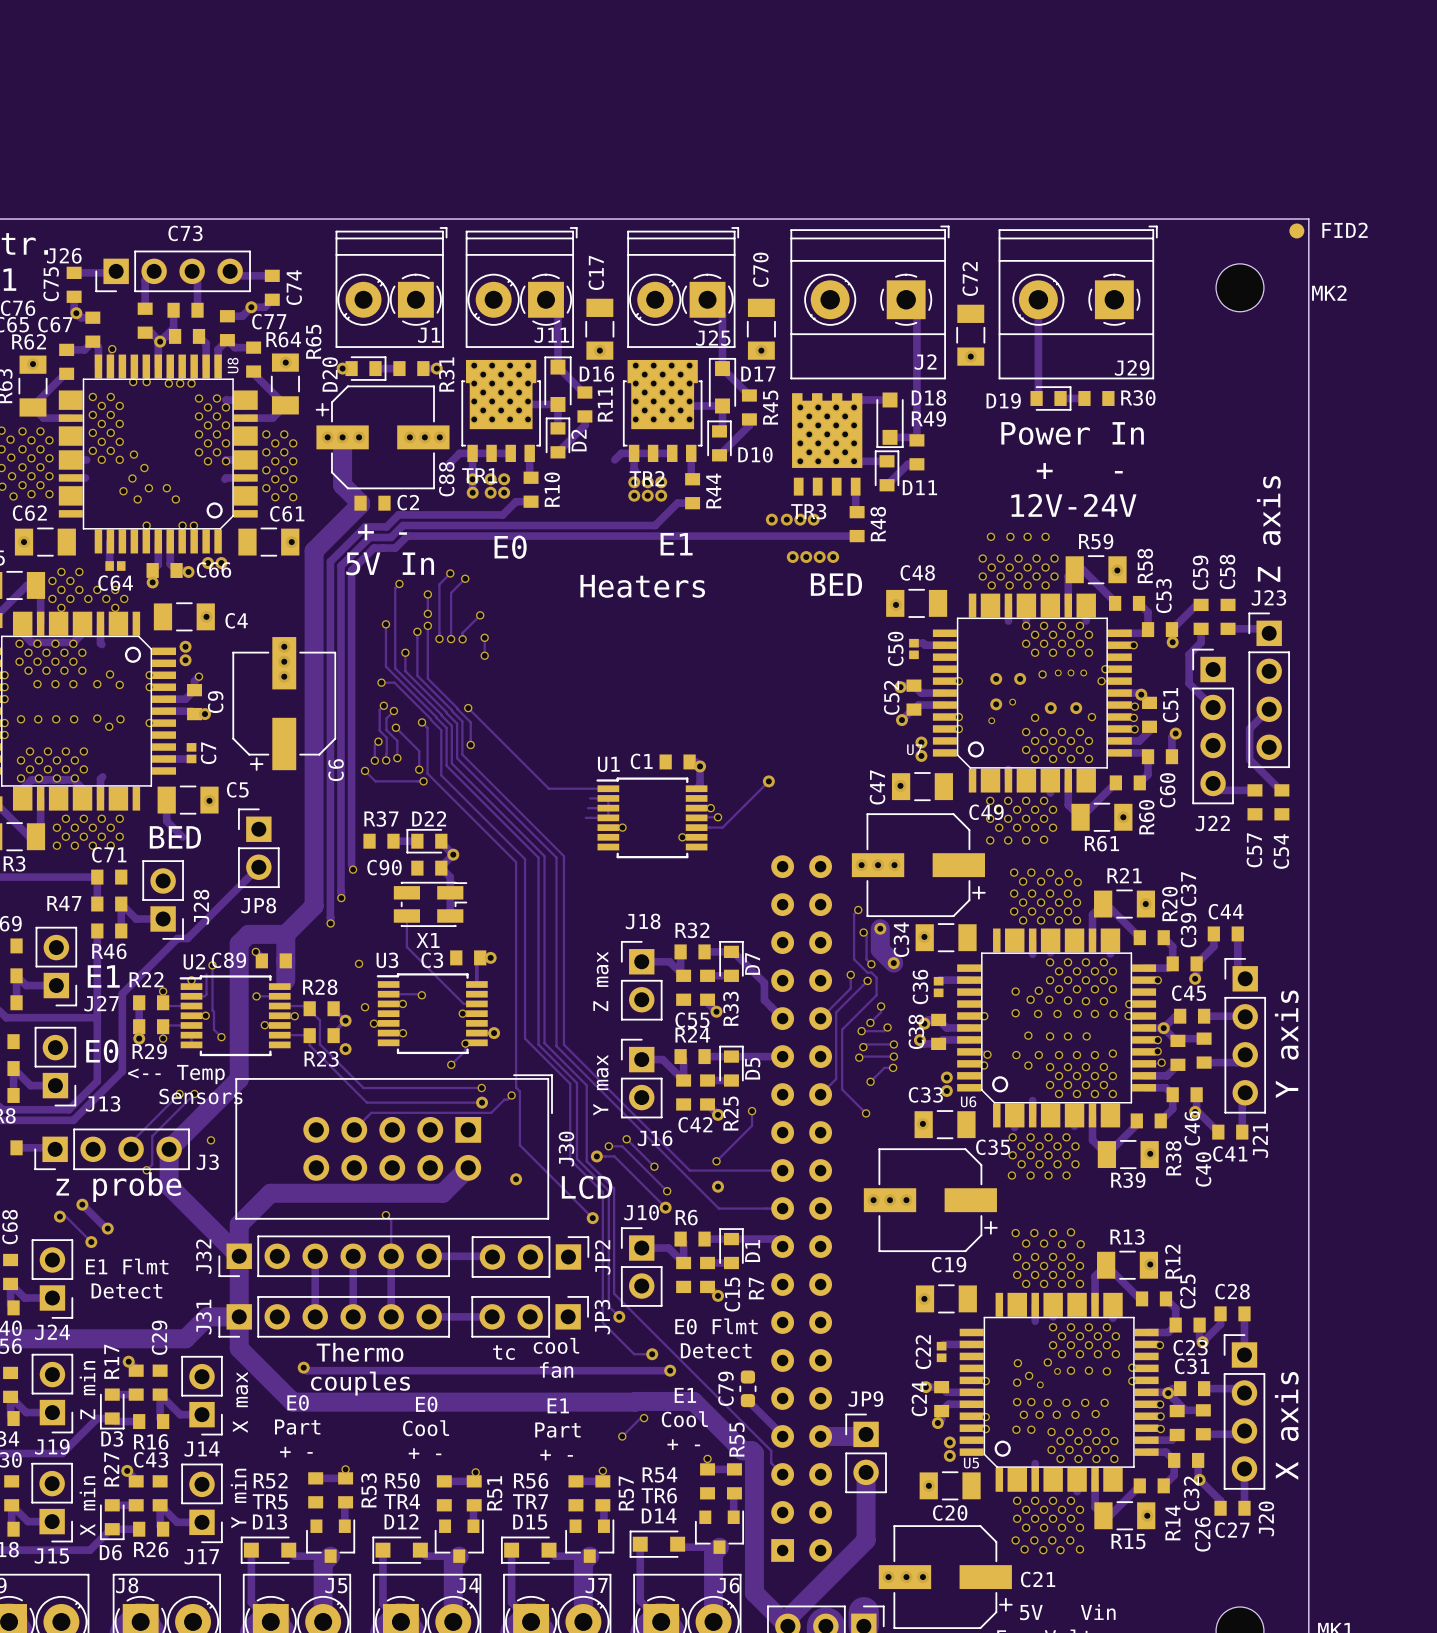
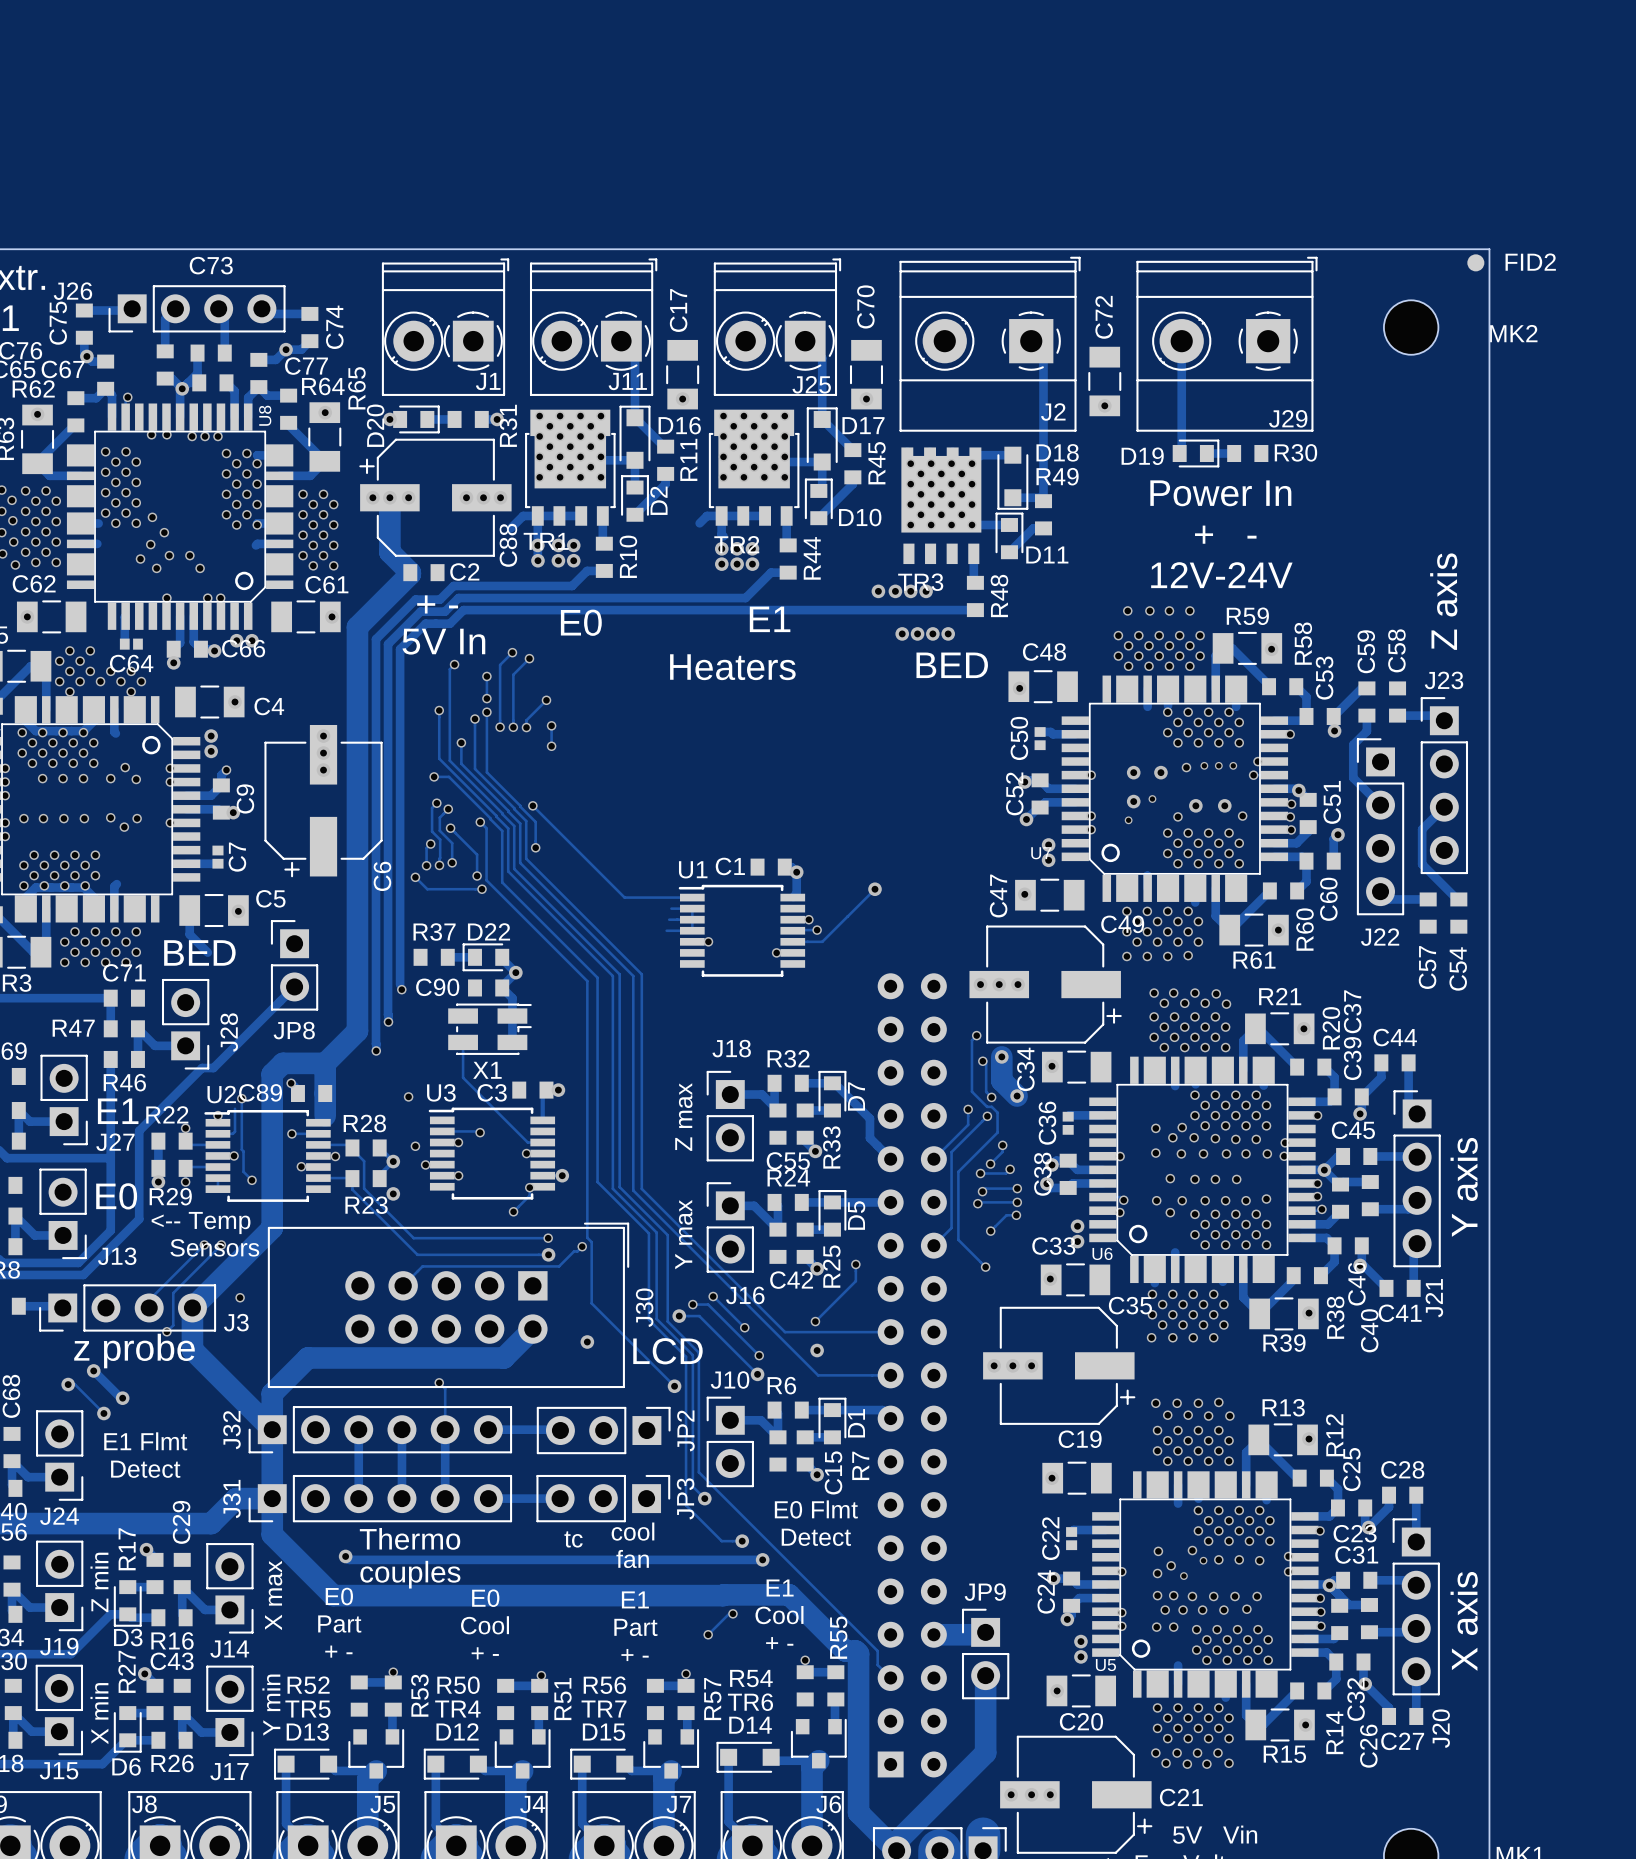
C79: (747, 1388) -> none
track: (747, 1400) (782, 1436) -> none

